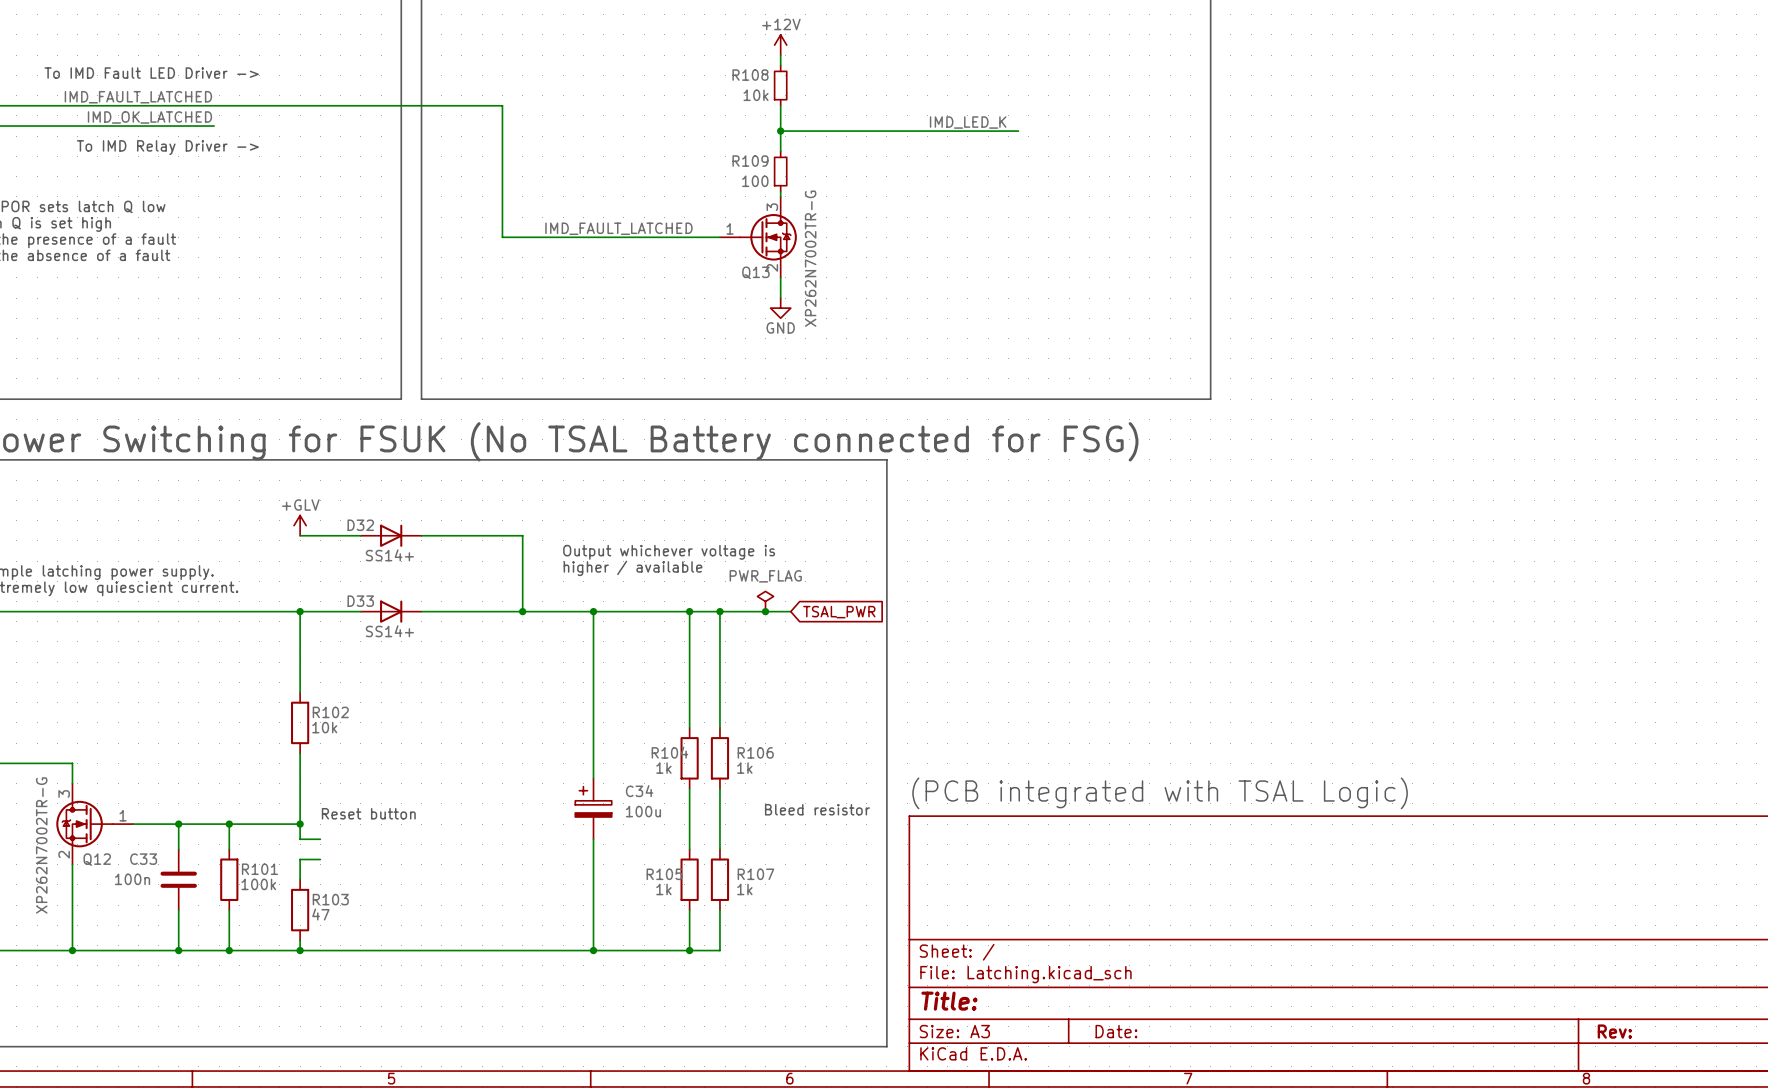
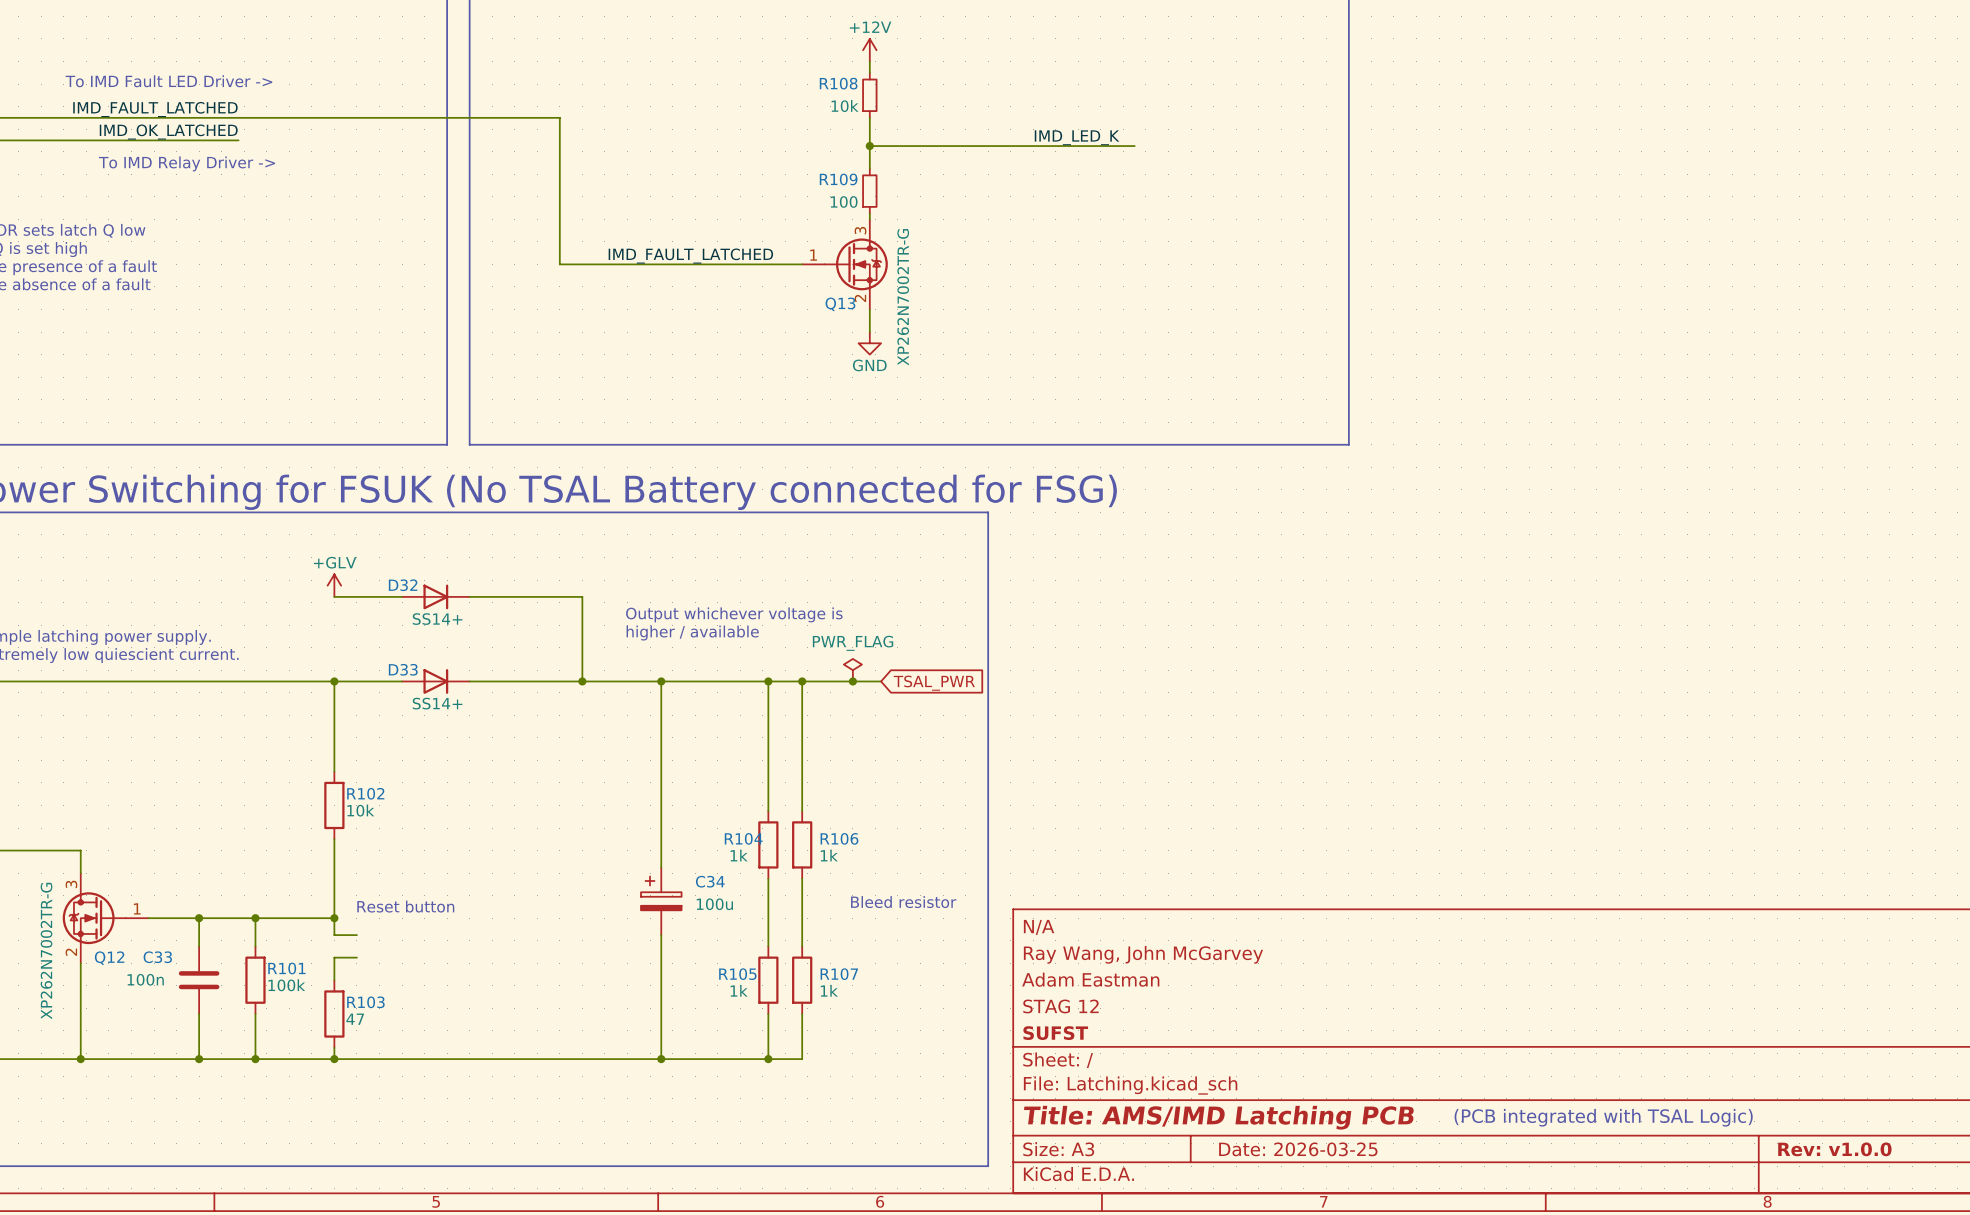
text: (PCB integrated with TSAL Logic) (1160, 793) -> none
title block: none -> N/A (1039, 927)
title block: none -> Ray Wang, John McGarvey (1143, 954)
title block: none -> Adam Eastman (1090, 979)
title block: none -> STAG 12 (1060, 1006)
title block: none -> SUFST (1055, 1033)
title block: Title: (949, 1001) -> Title: AMS/IMD Latching PCB (1218, 1117)
text: none -> (PCB integrated with TSAL Logic) (1603, 1117)
title block: Date: (1116, 1031) -> Date: 2026-03-25 (1298, 1149)
title block: Rev: (1614, 1031) -> Rev: v1.0.0 (1834, 1149)

